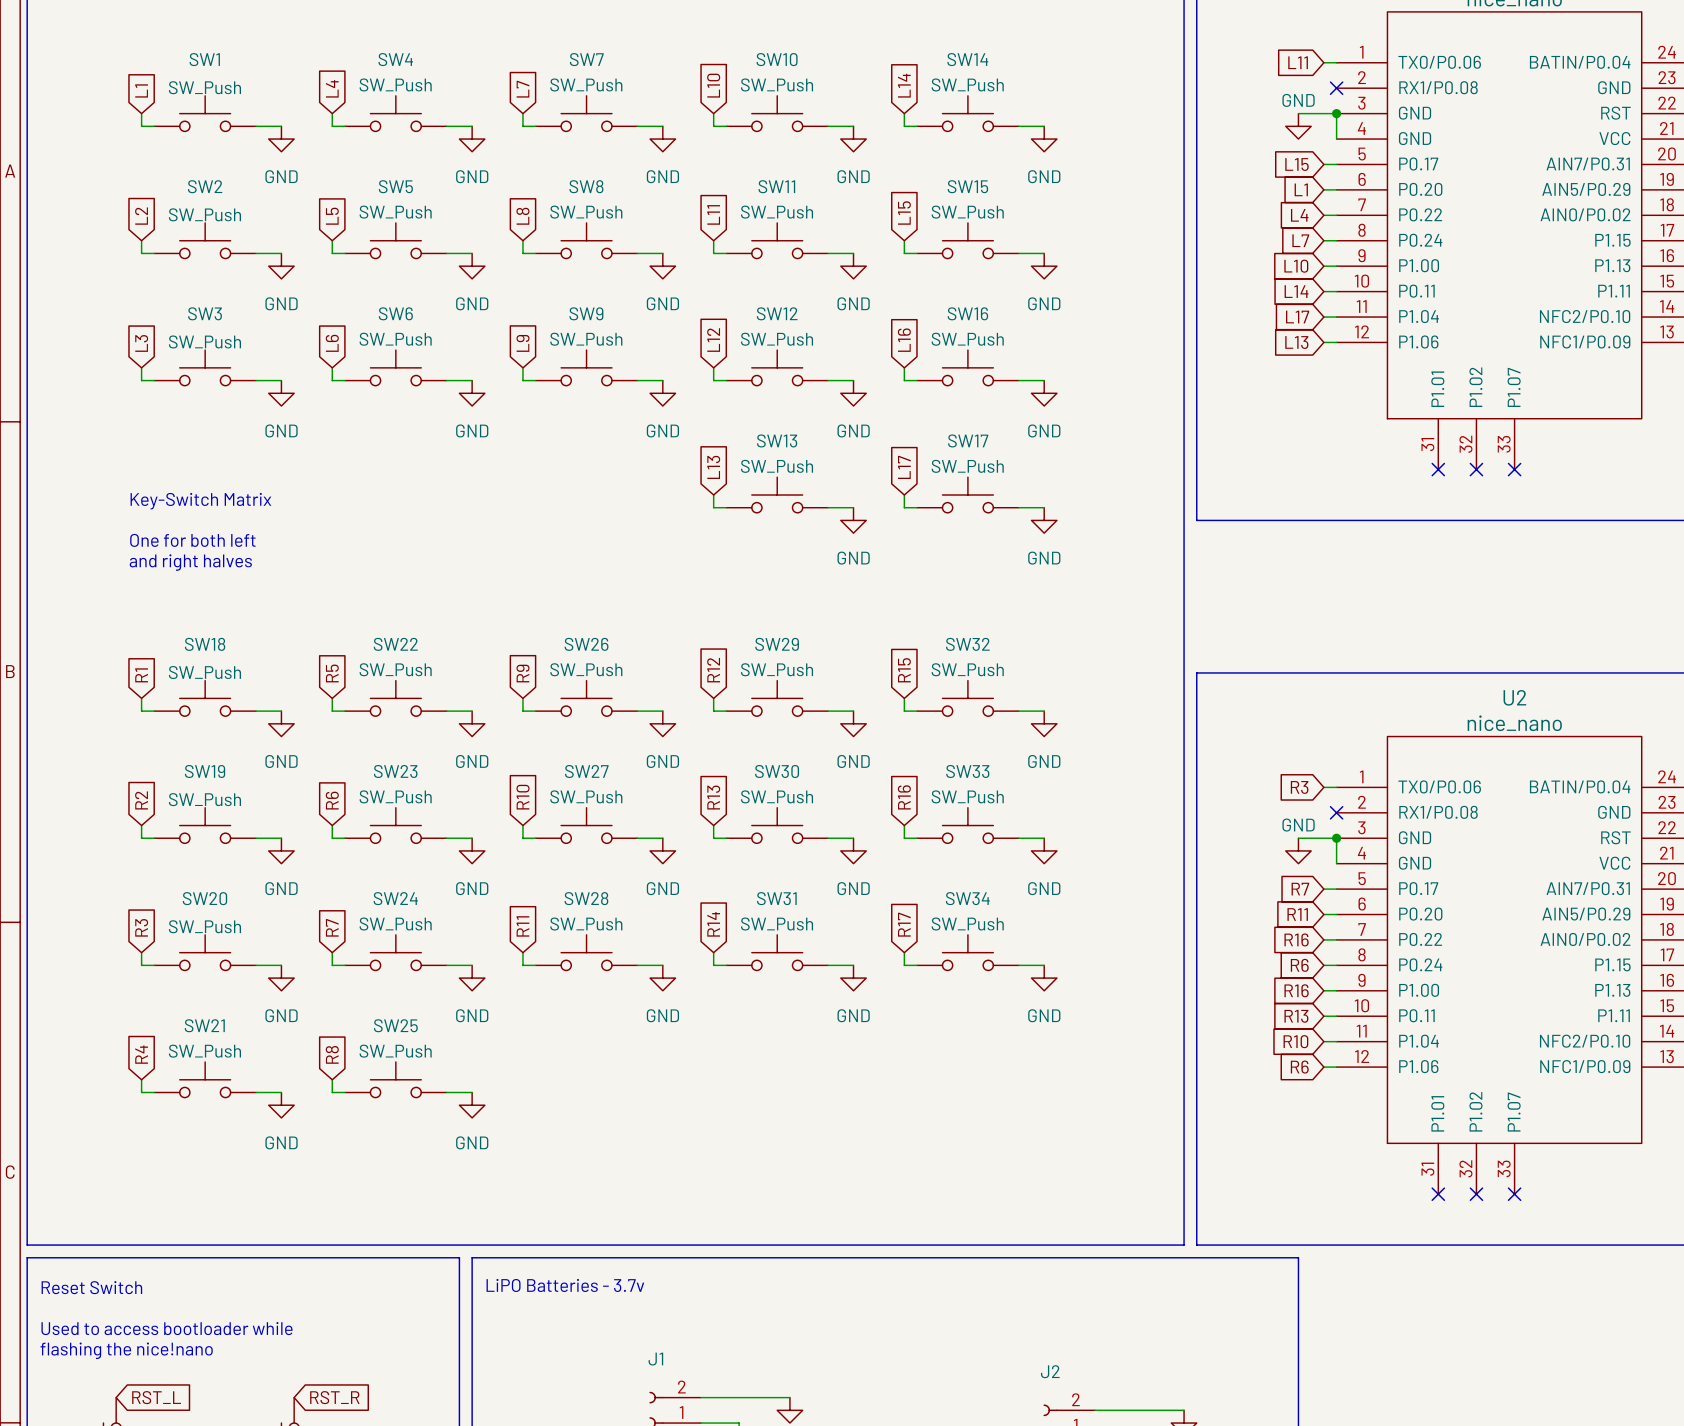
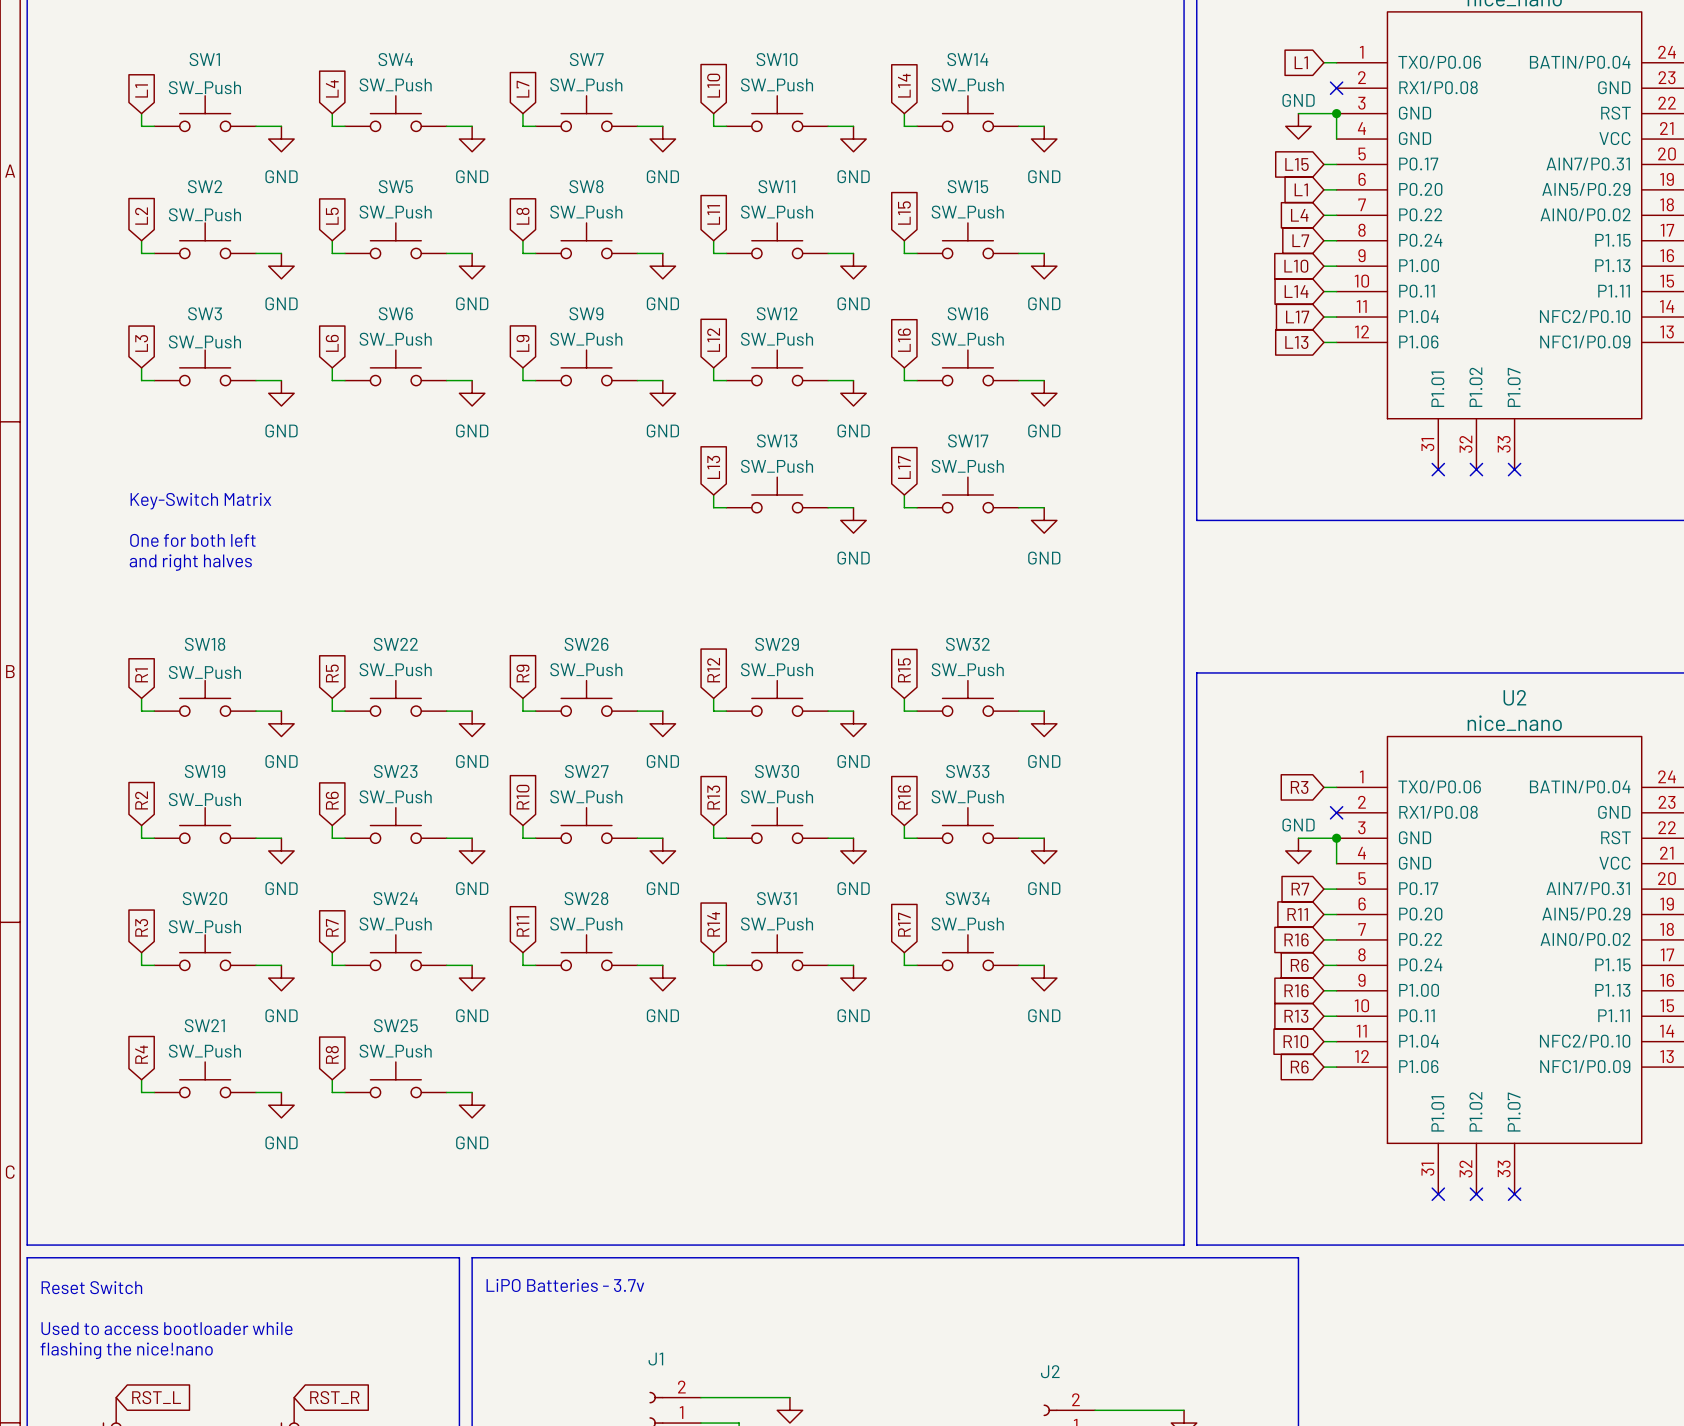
global label: L11 (1298, 62) -> L1 (1301, 62)

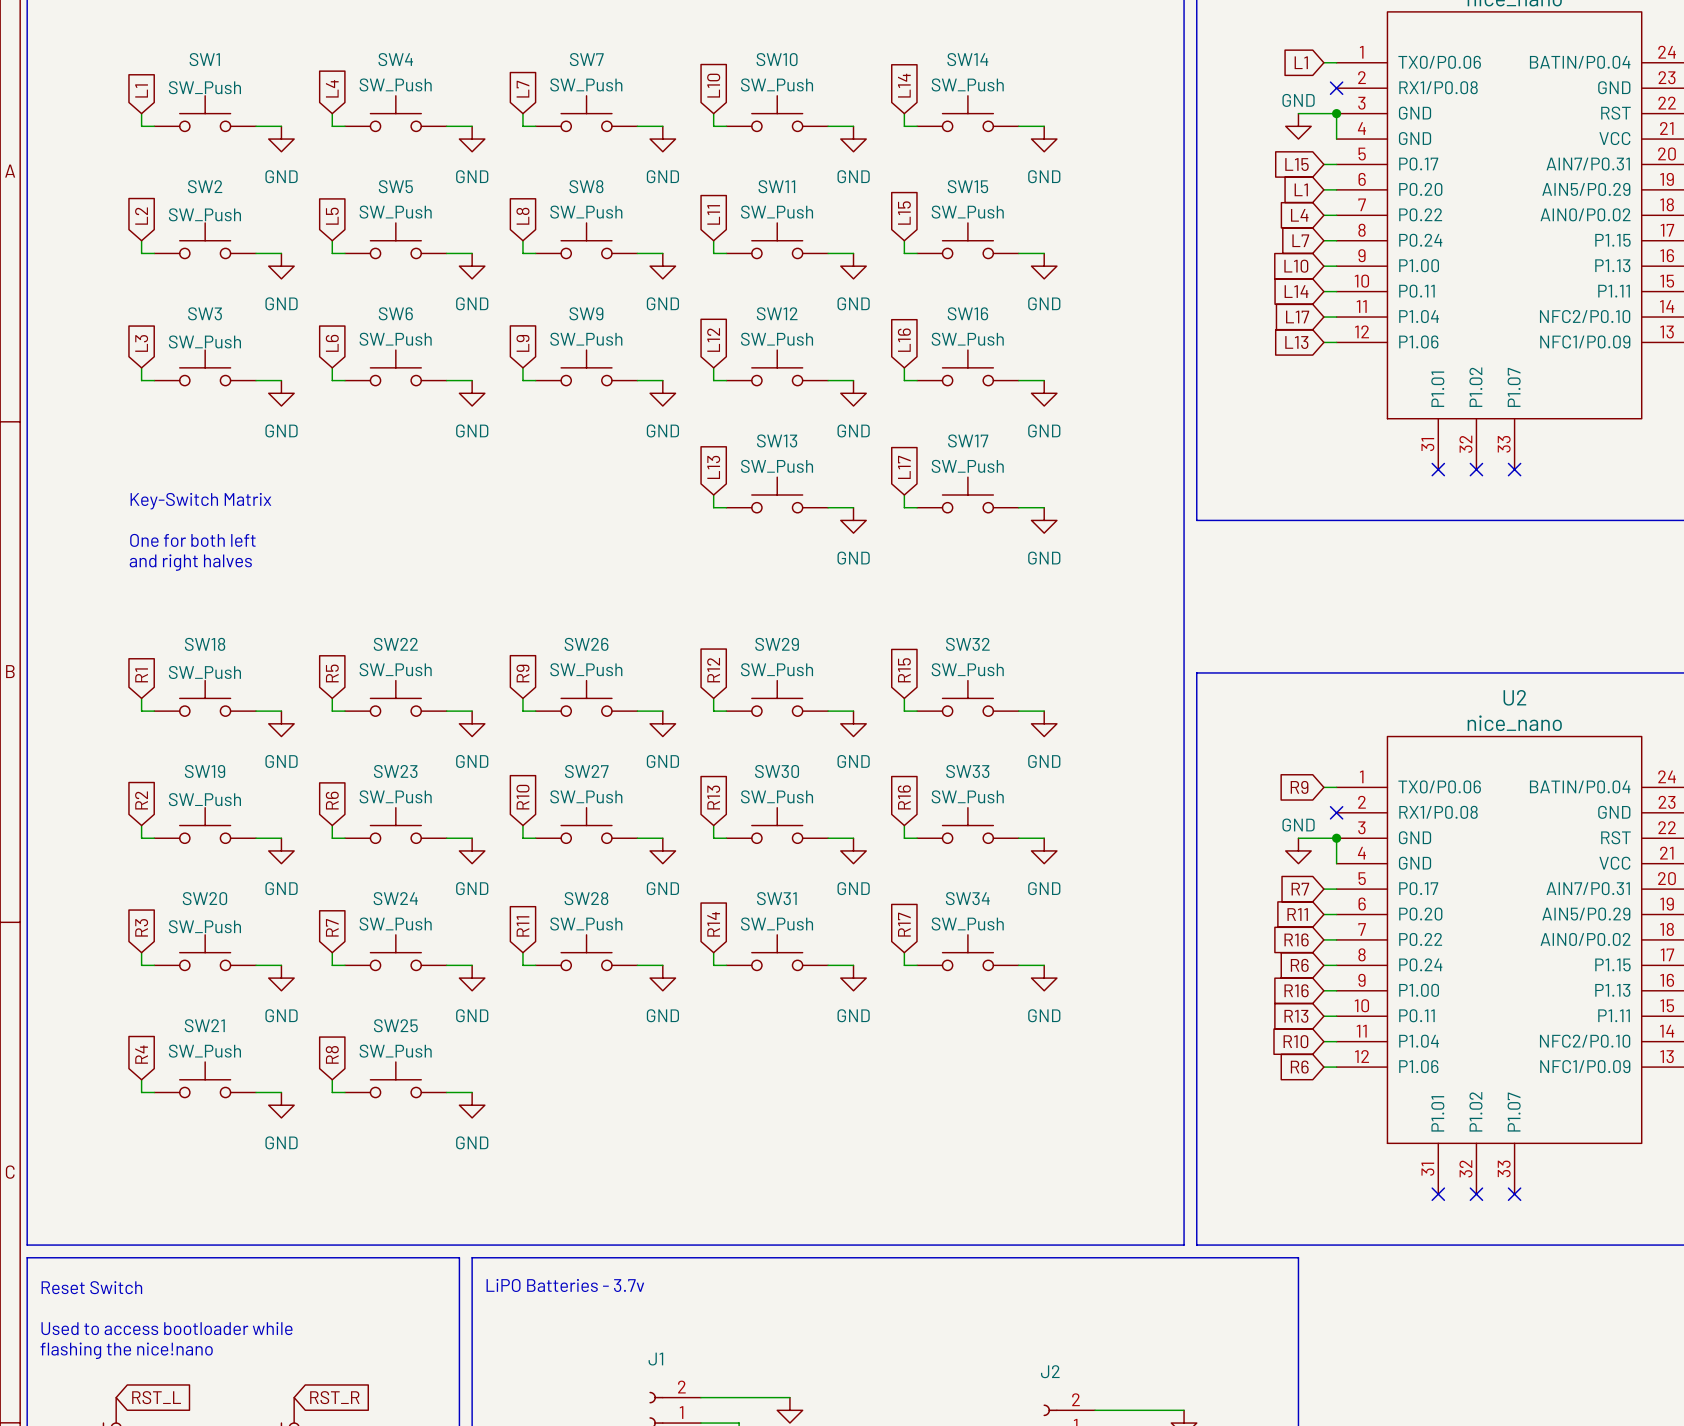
global label: R3 (1299, 787) -> R9 (1299, 787)

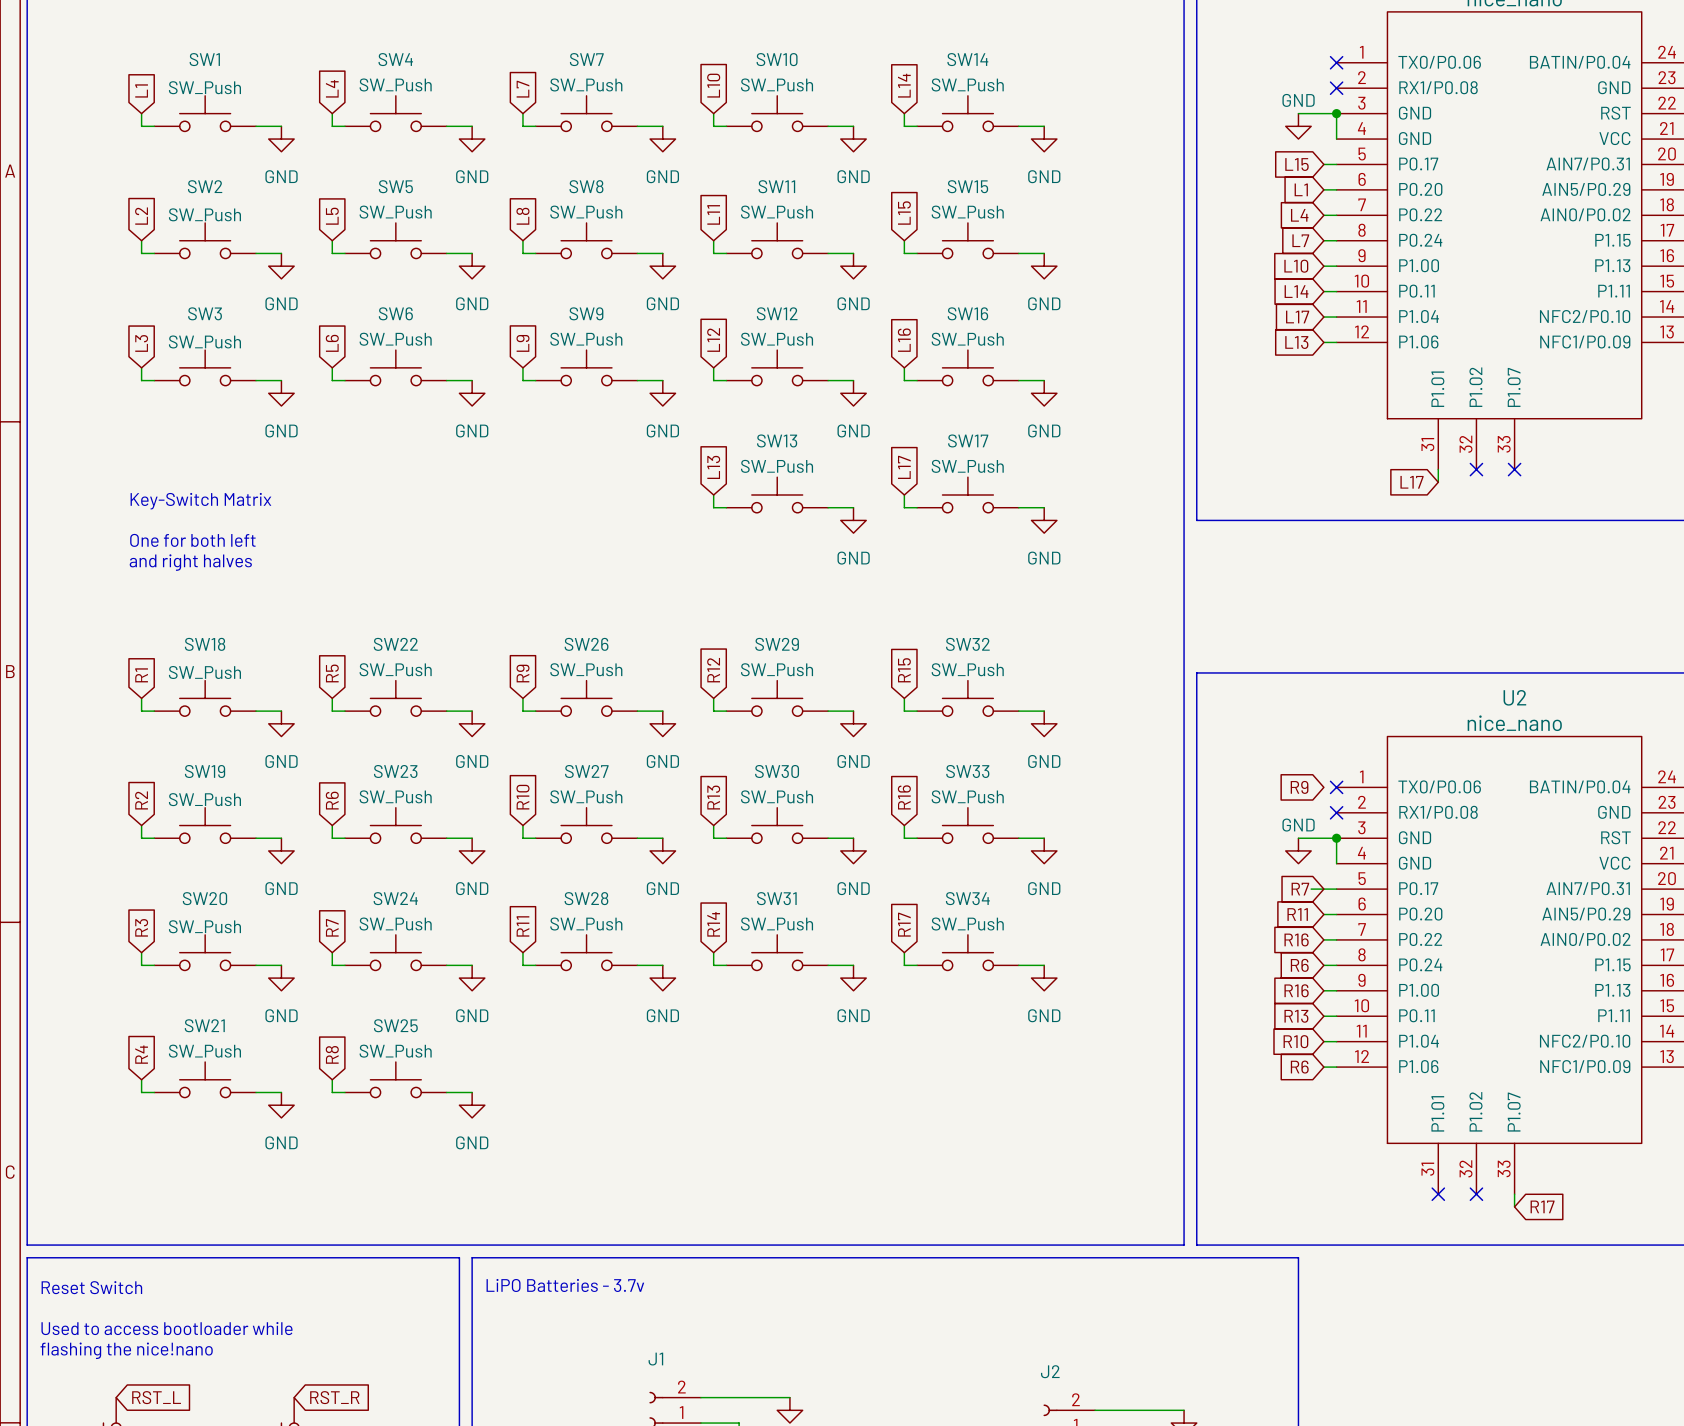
global label: L1 (1301, 62) -> none
wire: (1323, 62) (1336, 62) -> none
no-connect mark: none -> (1336, 62)
wire: none -> (1438, 469) (1438, 482)
no-connect mark: (1438, 469) -> none
global label: none -> L17 (1412, 482)
wire: (1323, 787) (1336, 787) -> (1311, 889) (1323, 889)
no-connect mark: none -> (1336, 787)
wire: none -> (1514, 1194) (1514, 1206)
no-connect mark: (1514, 1194) -> none
global label: none -> R17 (1542, 1206)

